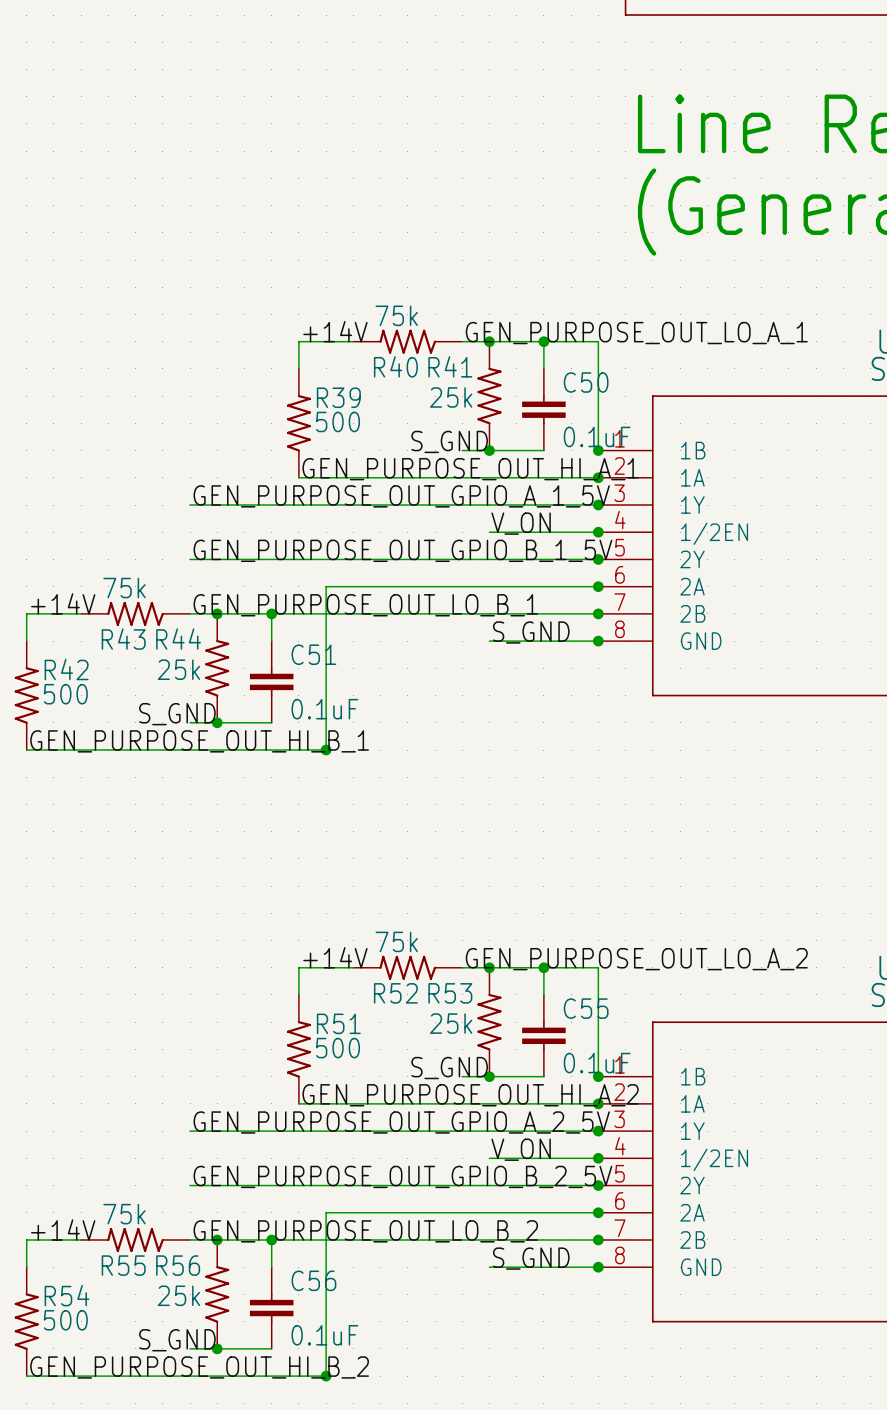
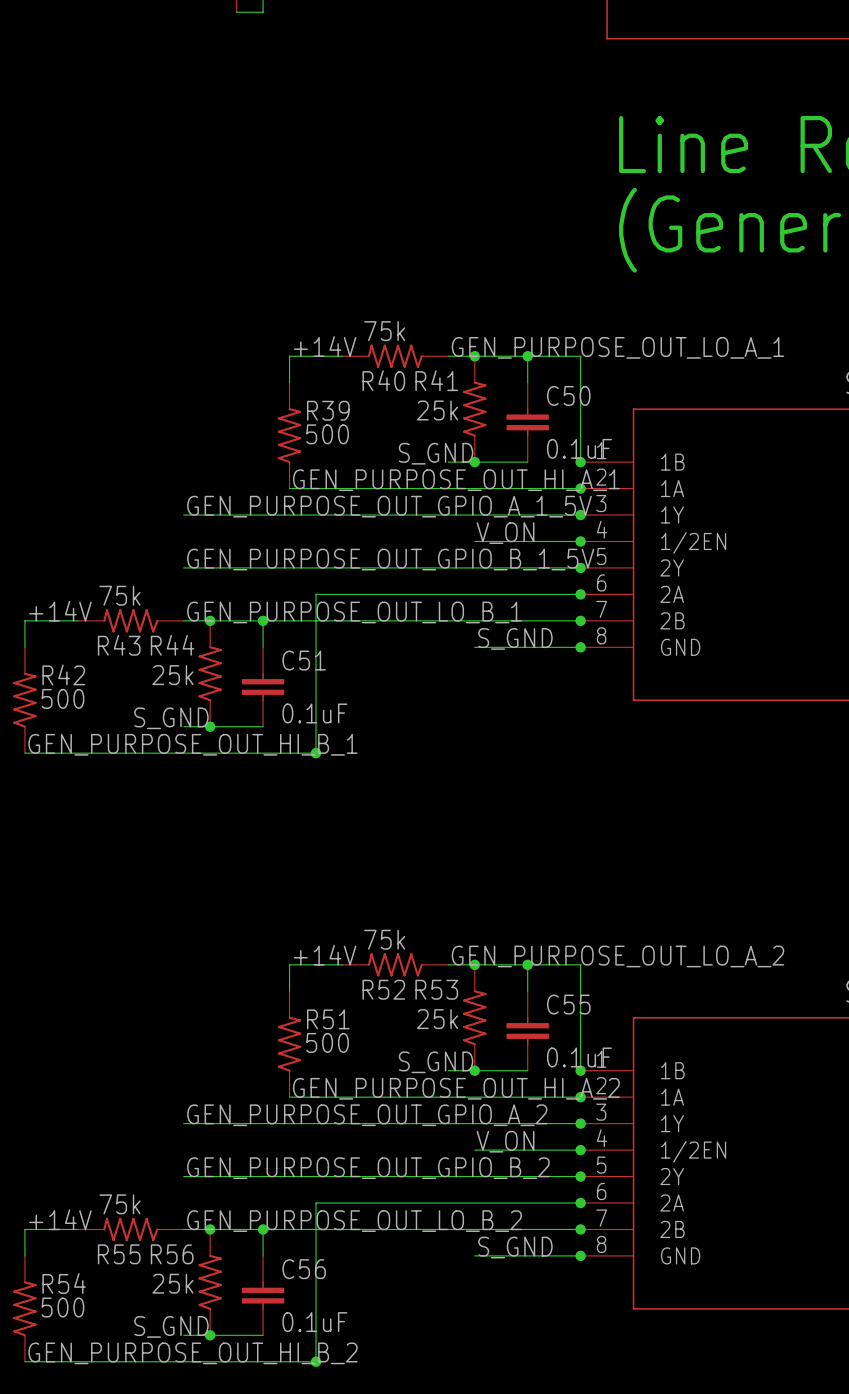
label: GEN_PURPOSE_OUT_GPIO_A_2_5V (401, 1122) -> GEN_PURPOSE_OUT_GPIO_A_2 (367, 1115)
label: GEN_PURPOSE_OUT_GPIO_B_2_5V (402, 1176) -> GEN_PURPOSE_OUT_GPIO_B_2 (368, 1168)

